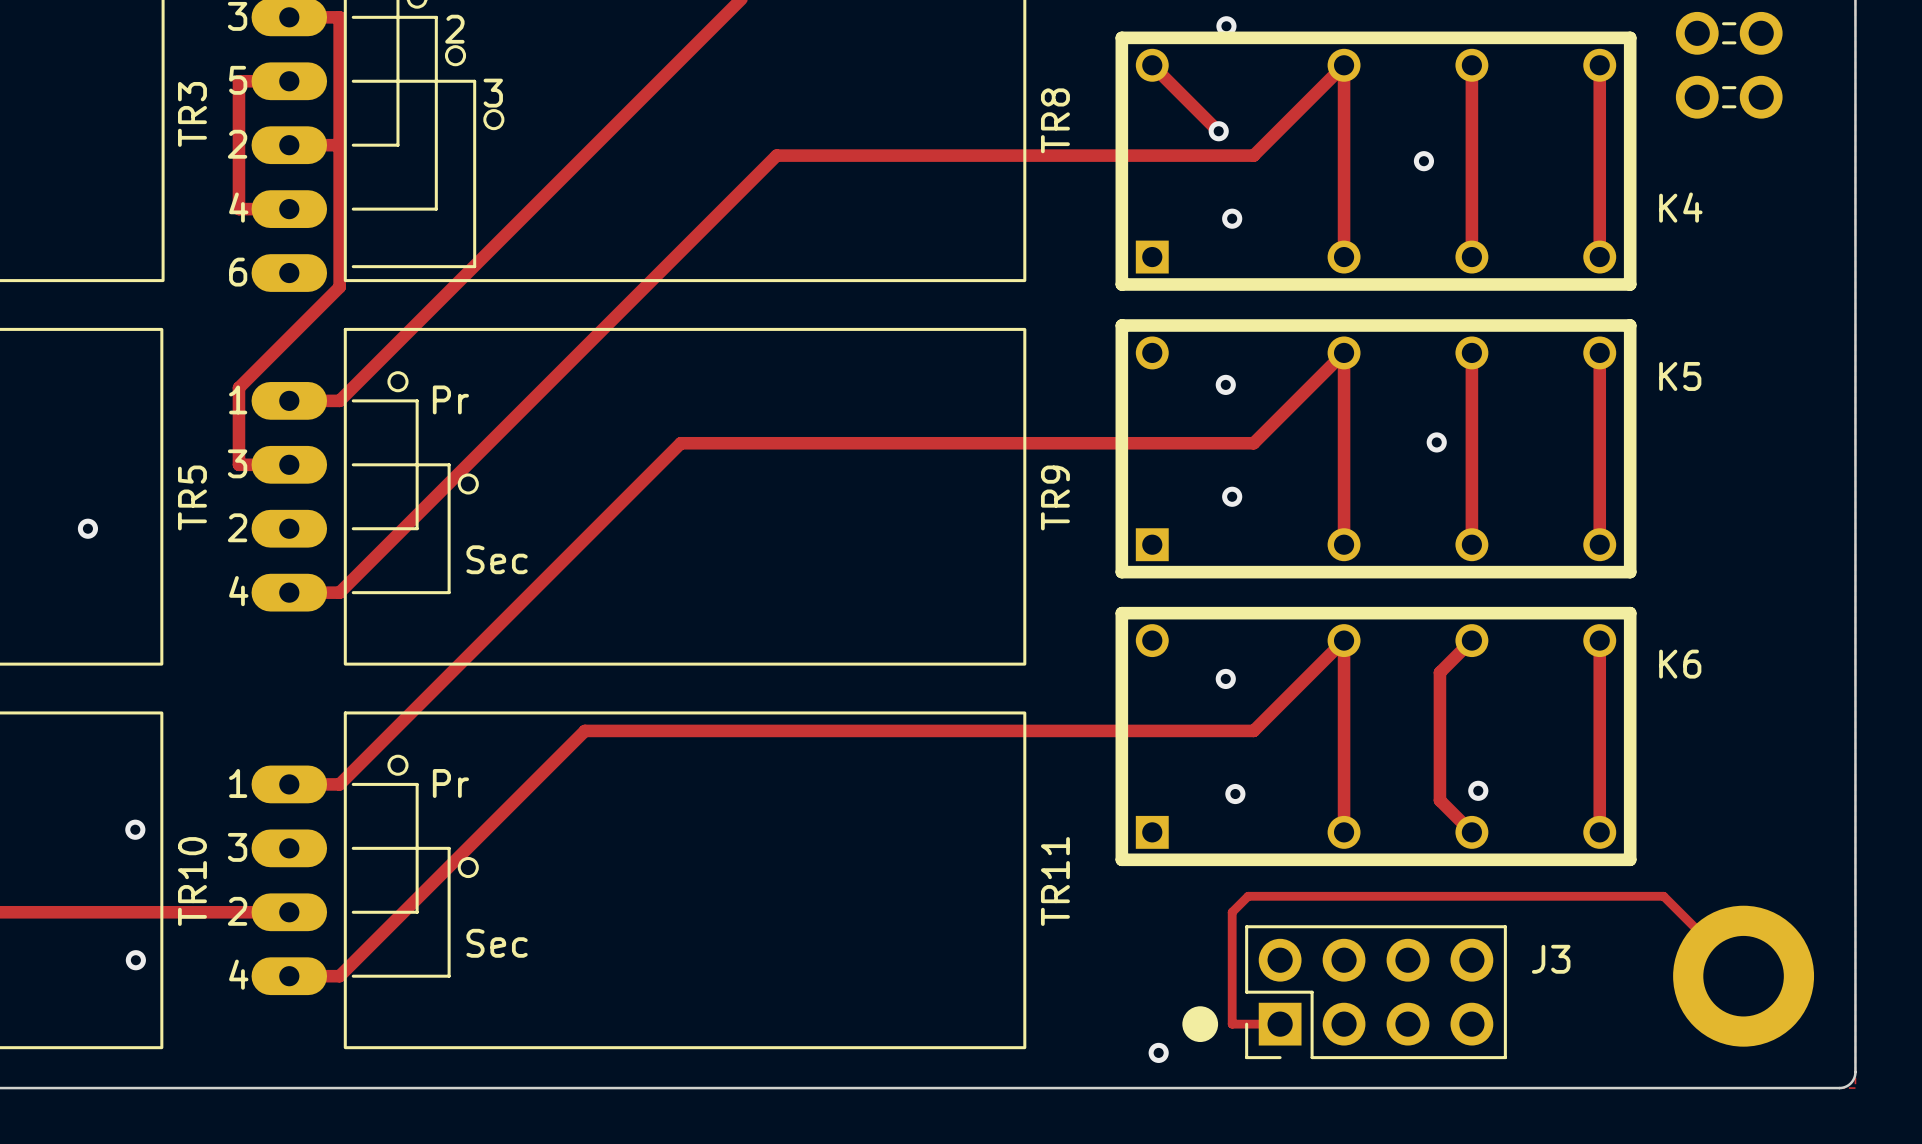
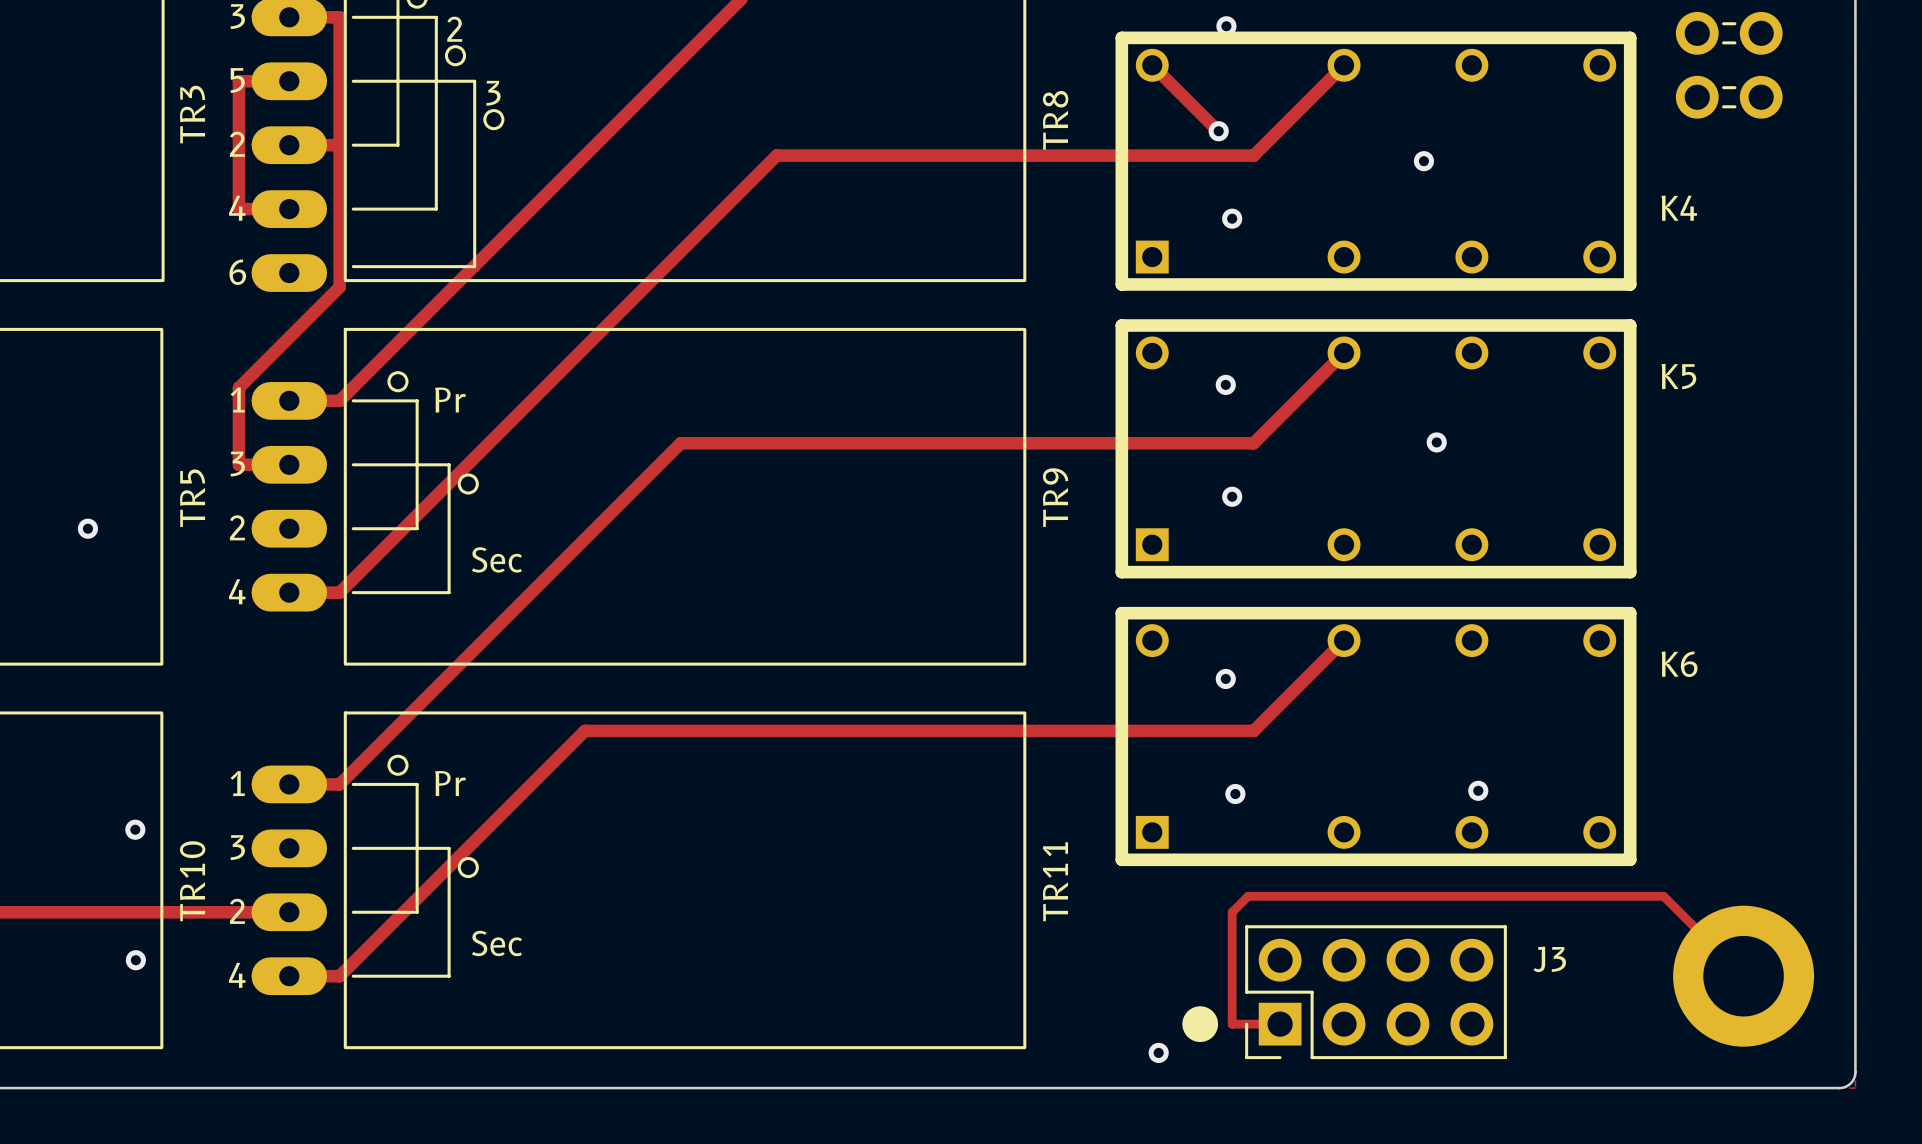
track: (1344, 65) (1344, 257) -> none
track: (1471, 65) (1471, 257) -> none
track: (1599, 65) (1599, 257) -> none
track: (1344, 352) (1344, 544) -> none
track: (1471, 352) (1471, 544) -> none
track: (1599, 352) (1599, 544) -> none
track: (1344, 640) (1344, 832) -> none
track: (1471, 640) (1439, 672) (1439, 800) (1471, 832) -> none
track: (1599, 640) (1599, 832) -> none

